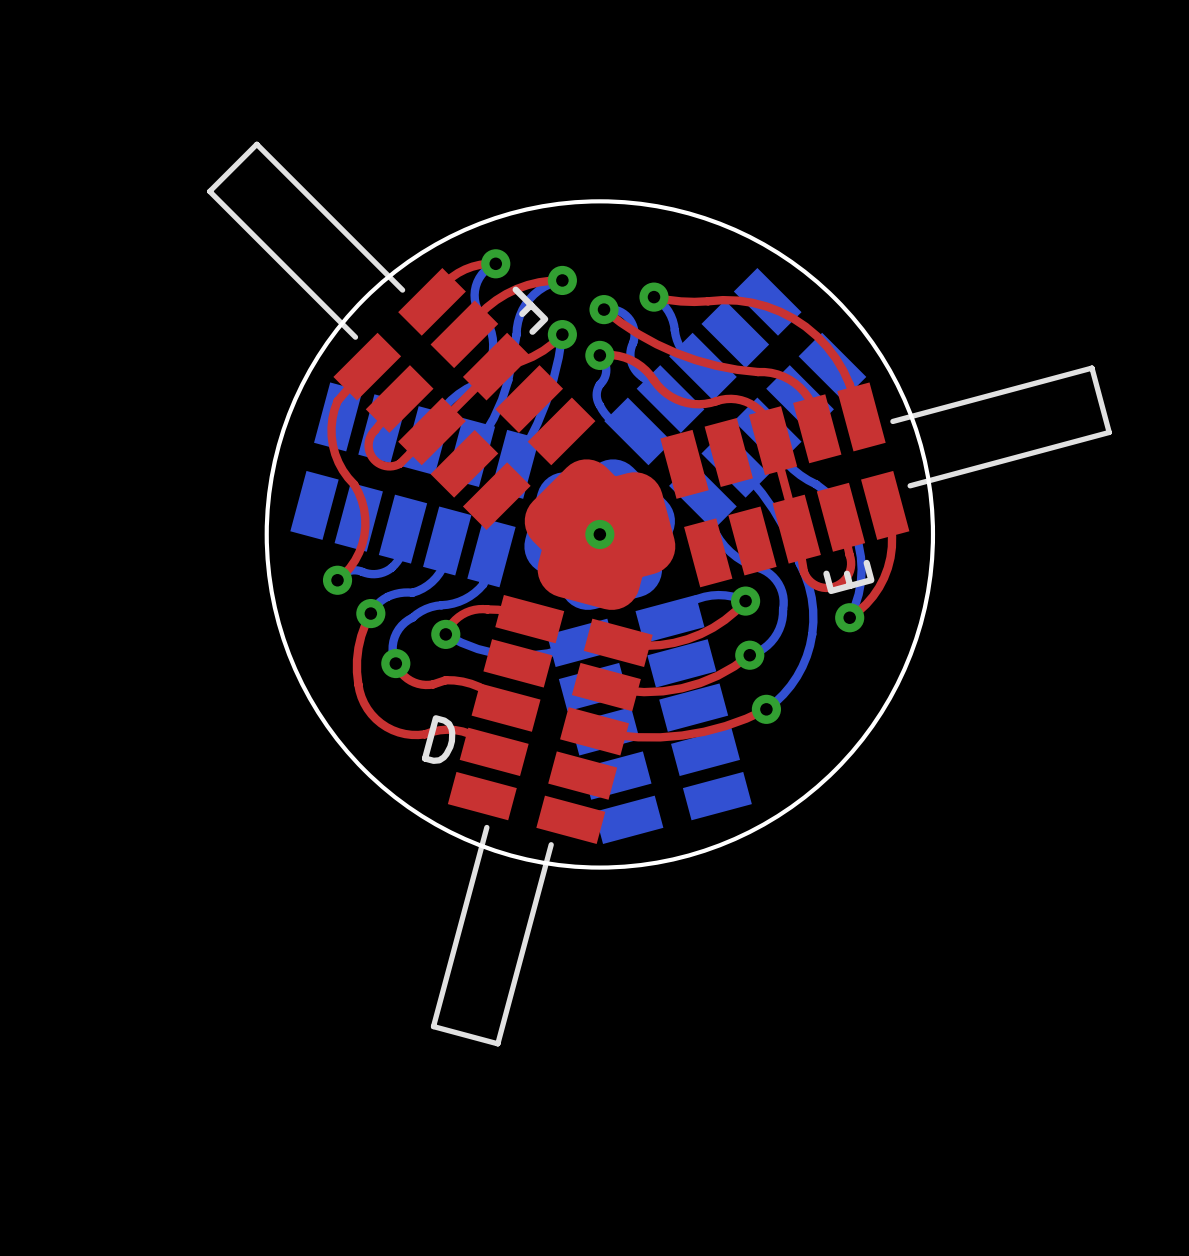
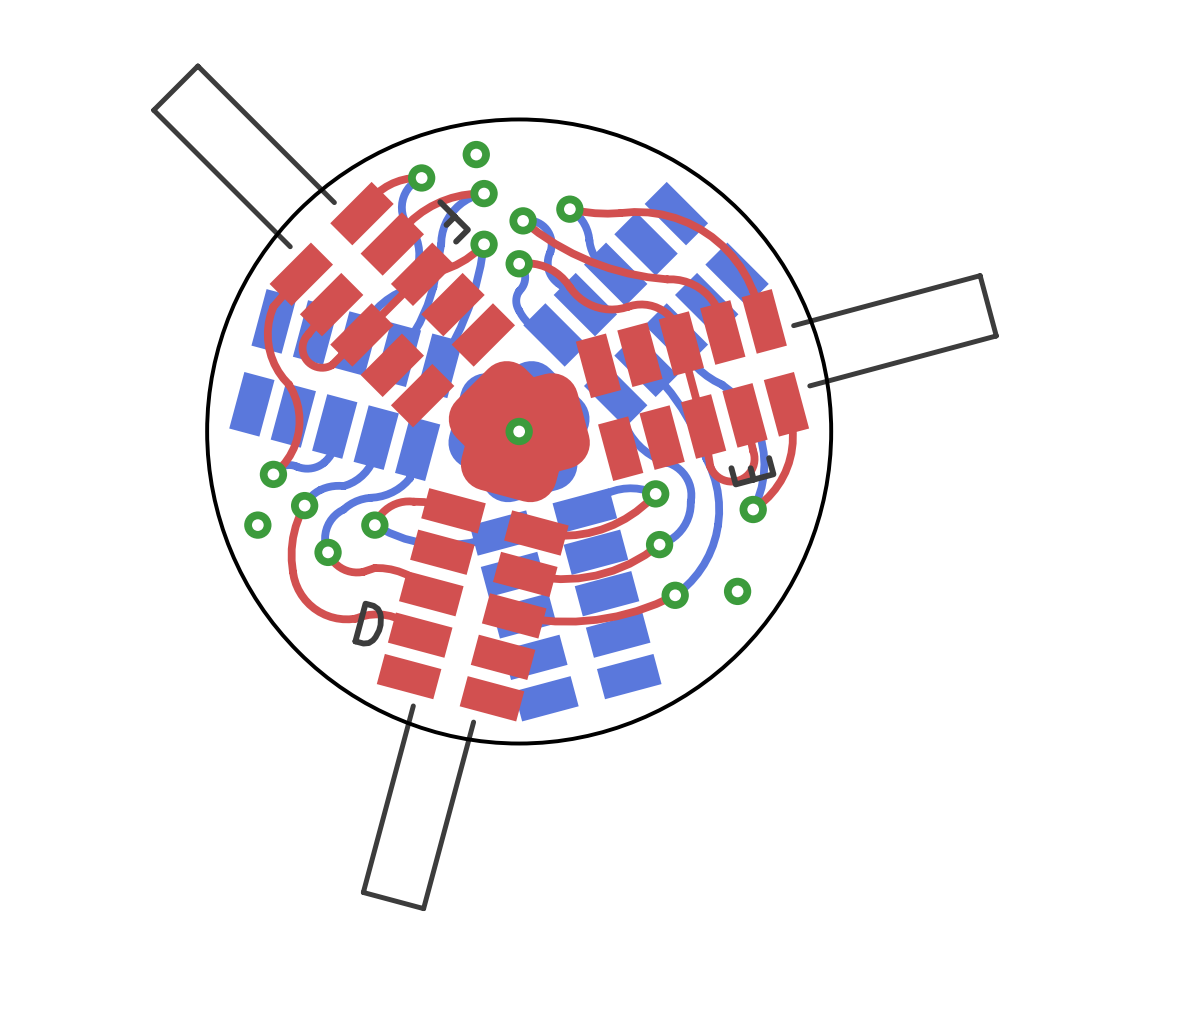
via: none -> (476, 154)
via: none -> (257, 525)
via: none -> (737, 591)

